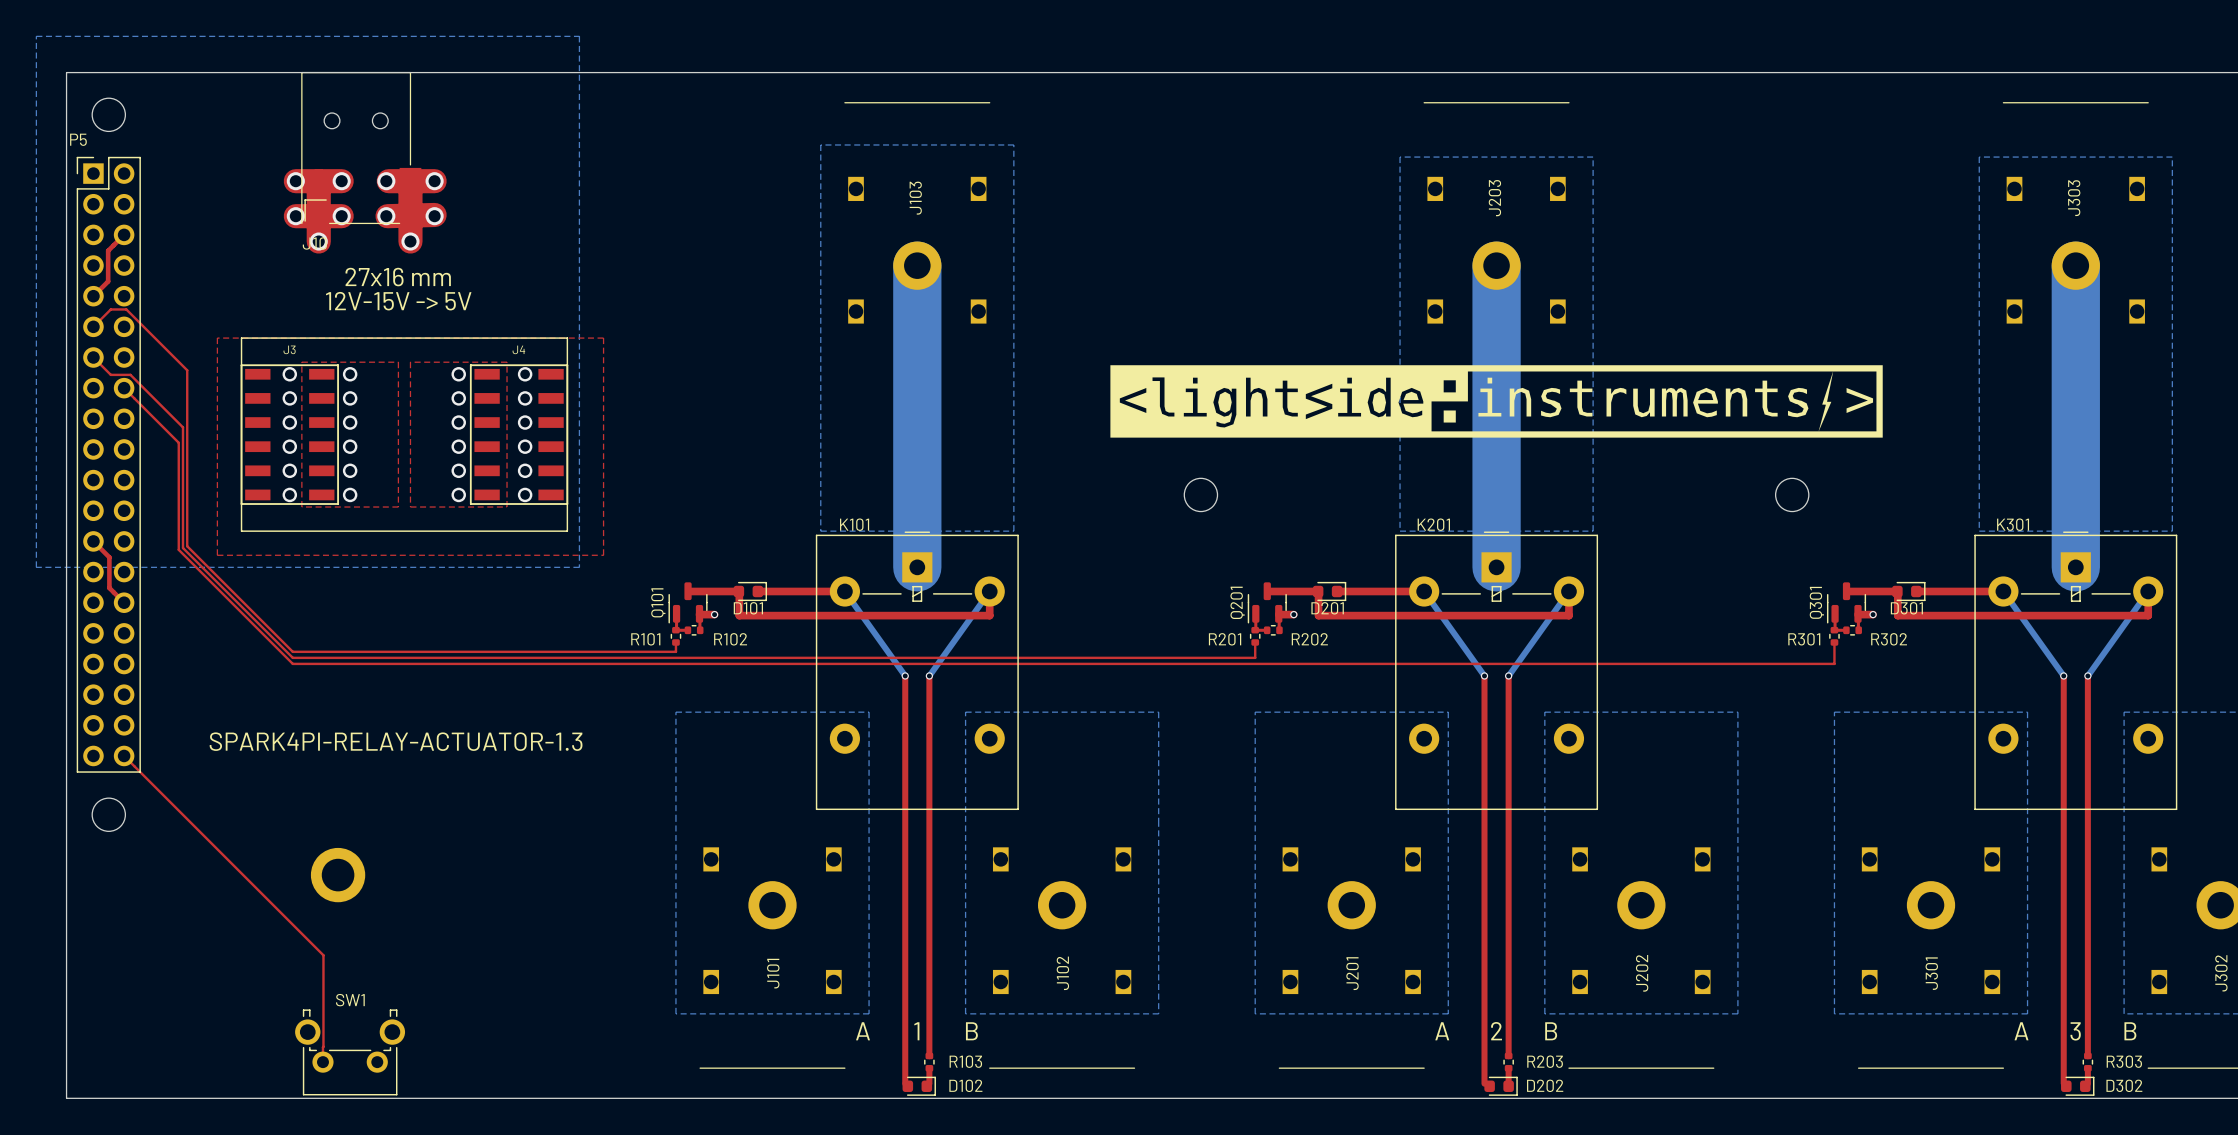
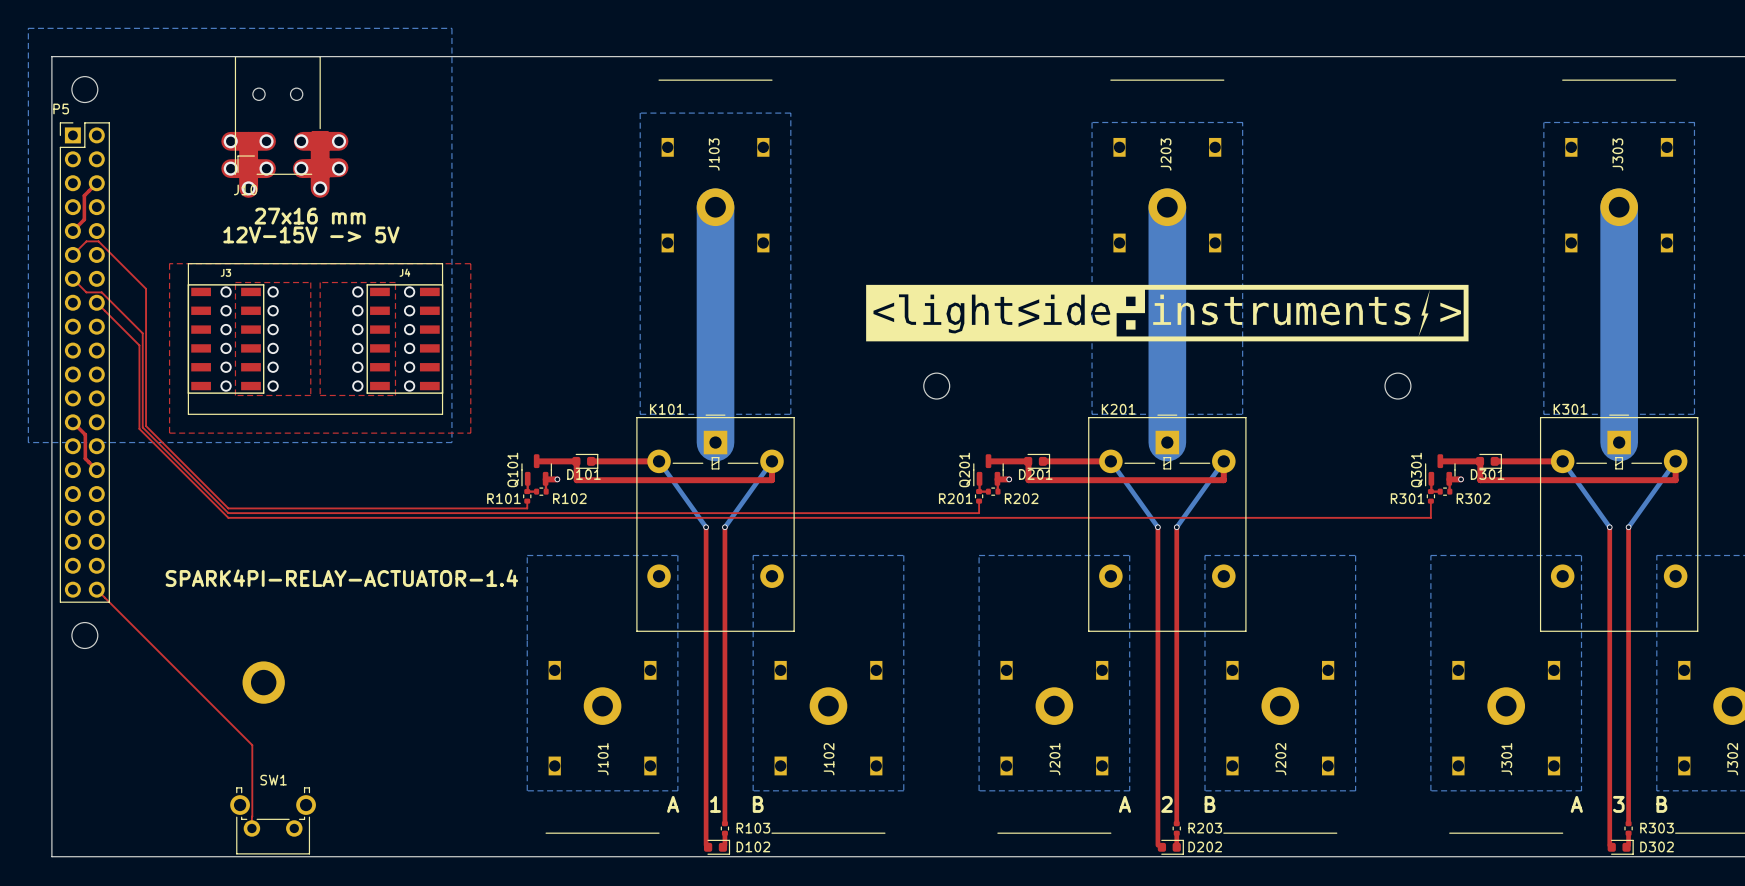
text: SPARK4PI-RELAY-ACTUATOR-1.3 (396, 741) -> SPARK4PI-RELAY-ACTUATOR-1.4 (341, 578)

